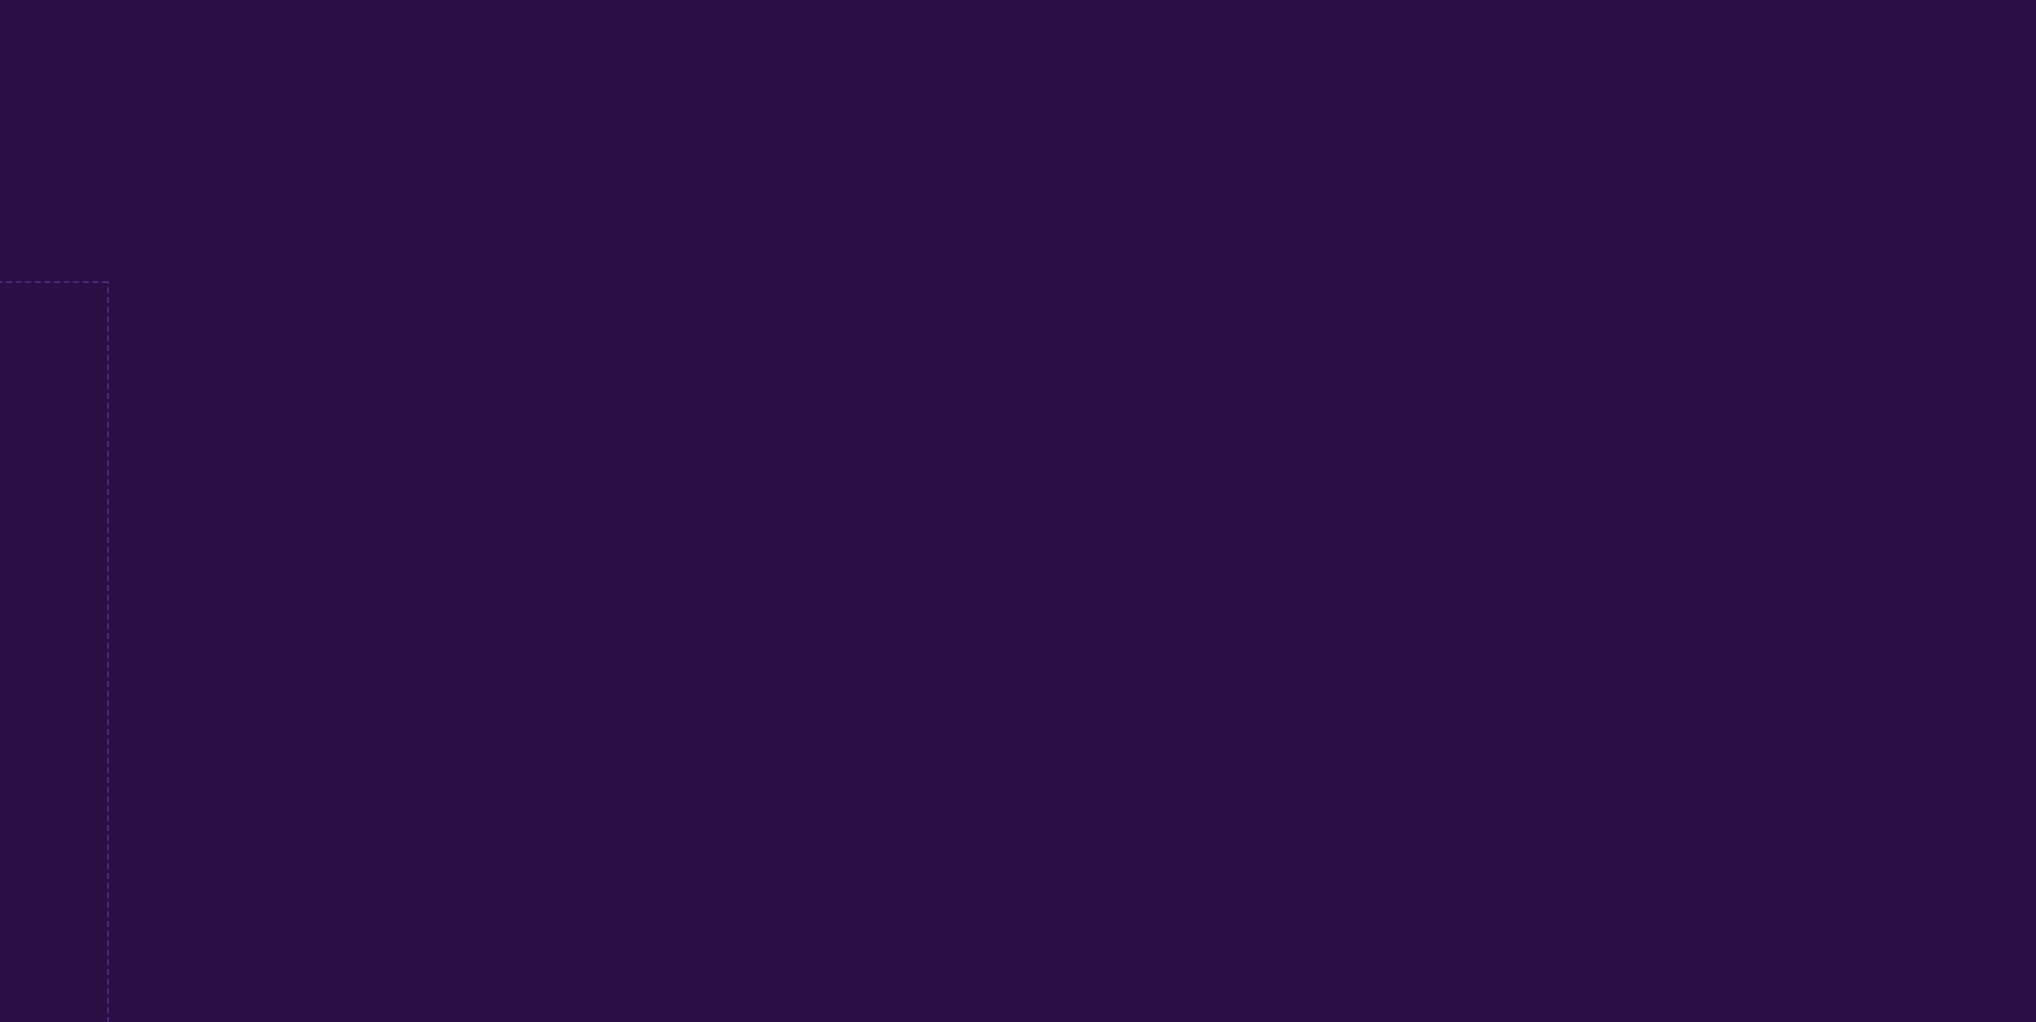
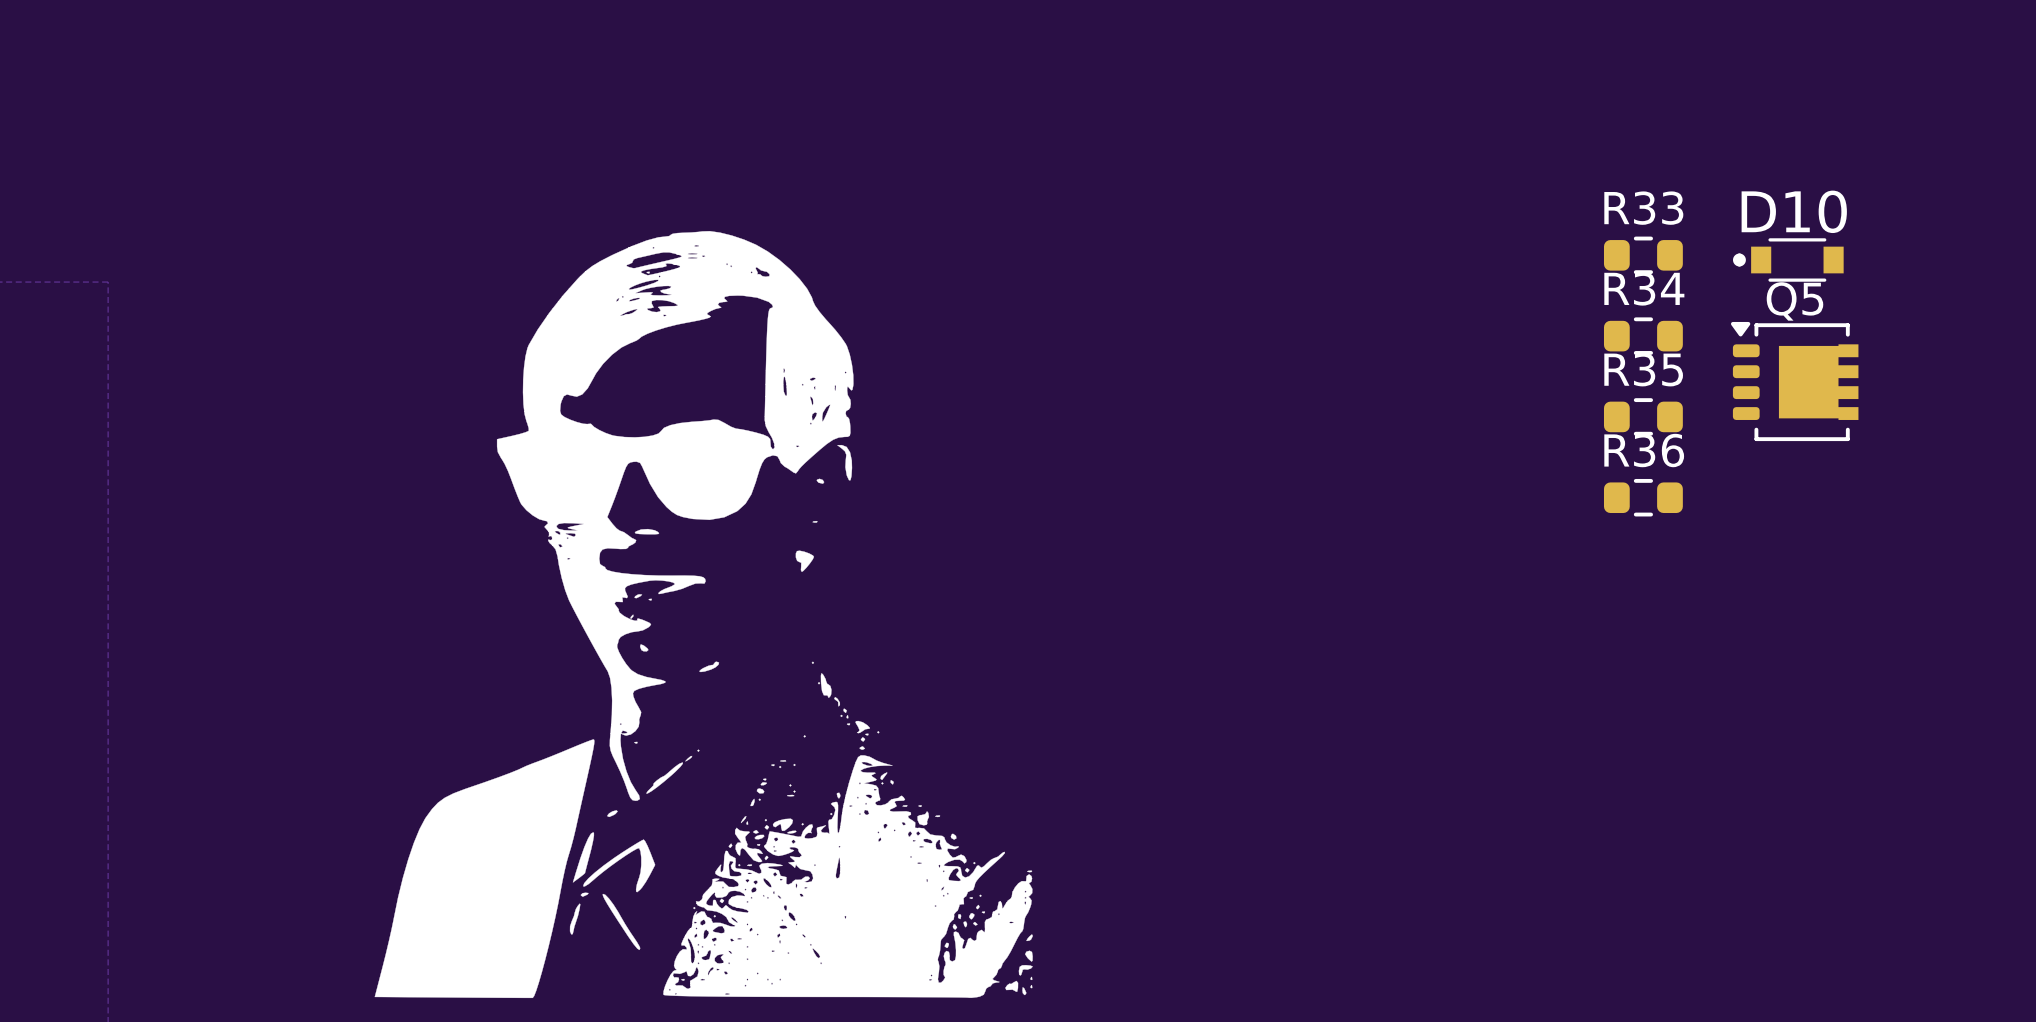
drawing: none -> [374, 231, 1033, 999]
R33: none -> (1643, 255)
D10: none -> (1788, 260)
R34: none -> (1643, 336)
Q5: none -> (1794, 381)
R35: none -> (1643, 416)
R36: none -> (1643, 497)

